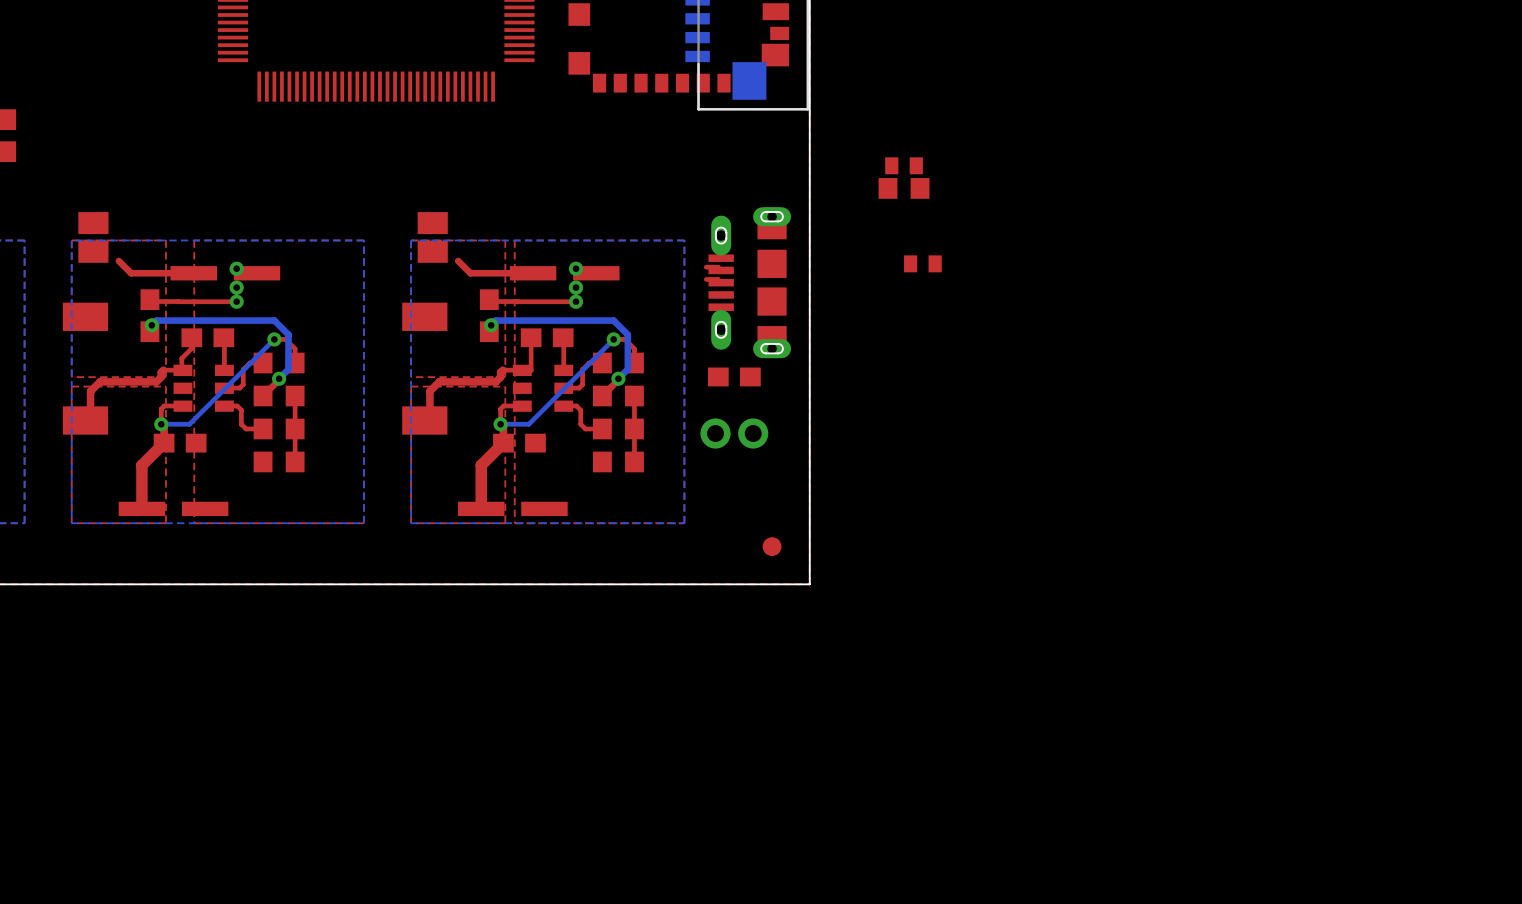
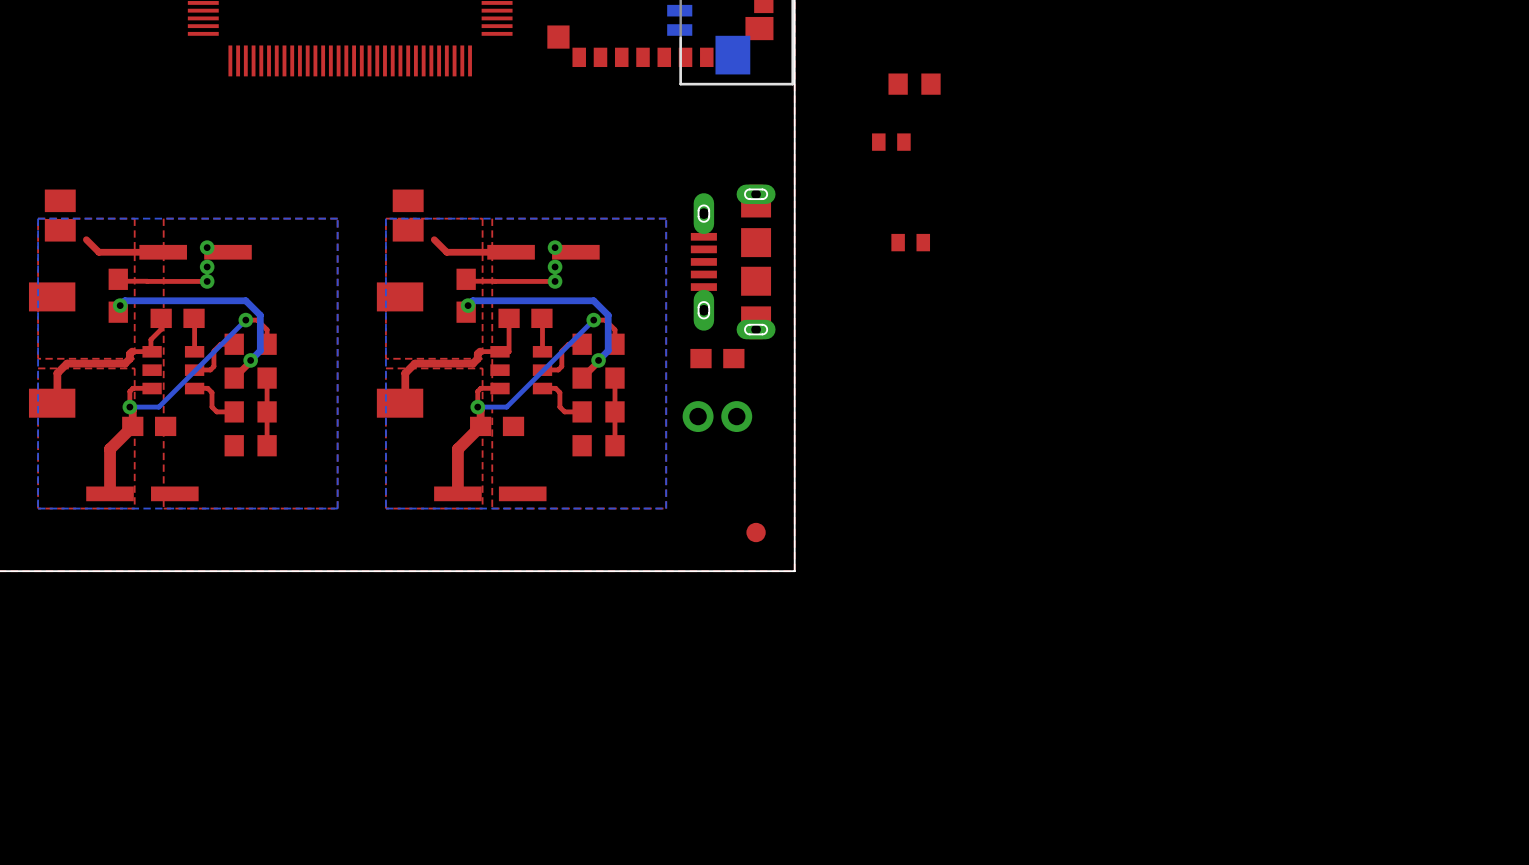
part position: (904, 188) -> (914, 84)
top track: (706, 267) (717, 267) (721, 270) -> none
top track: (706, 279) (717, 279) (721, 282) -> none

